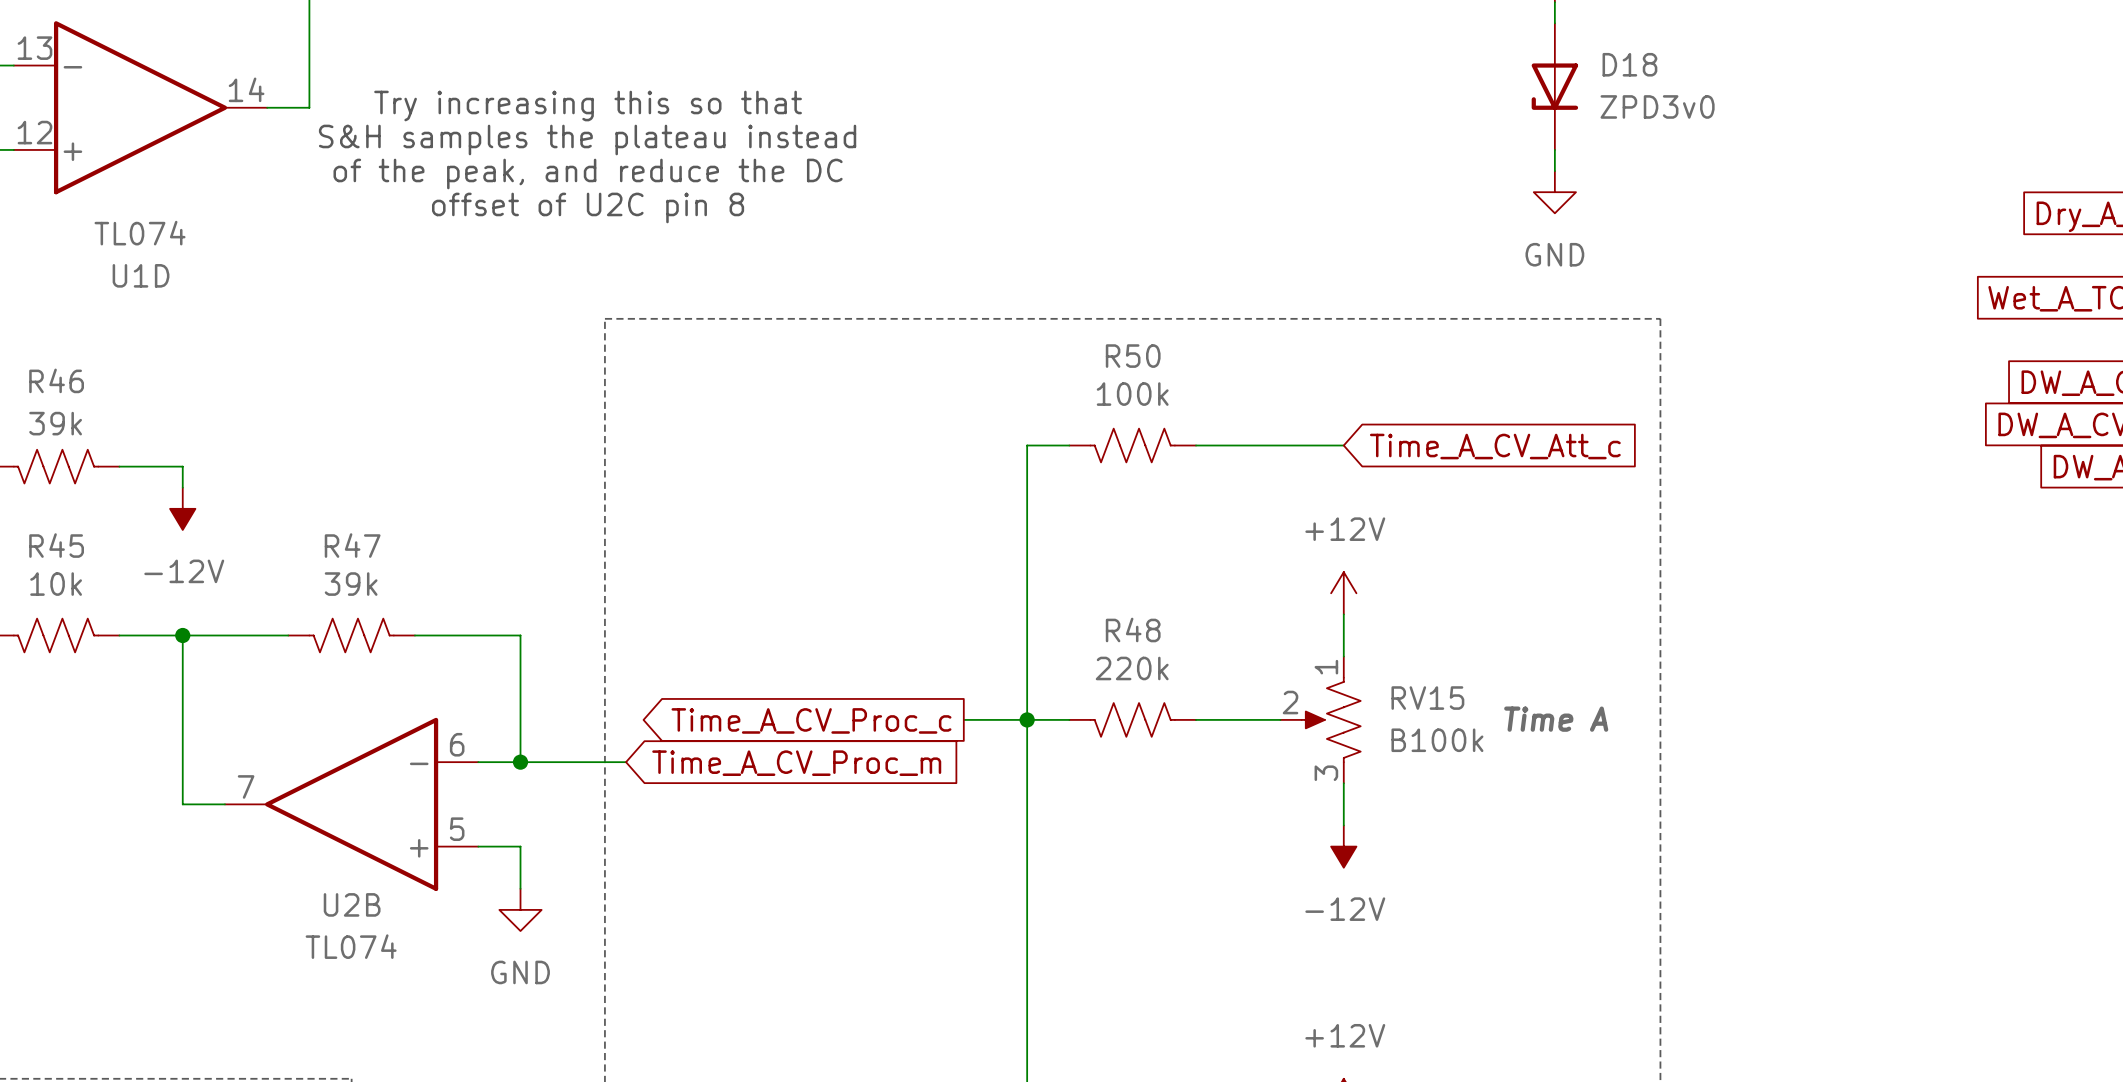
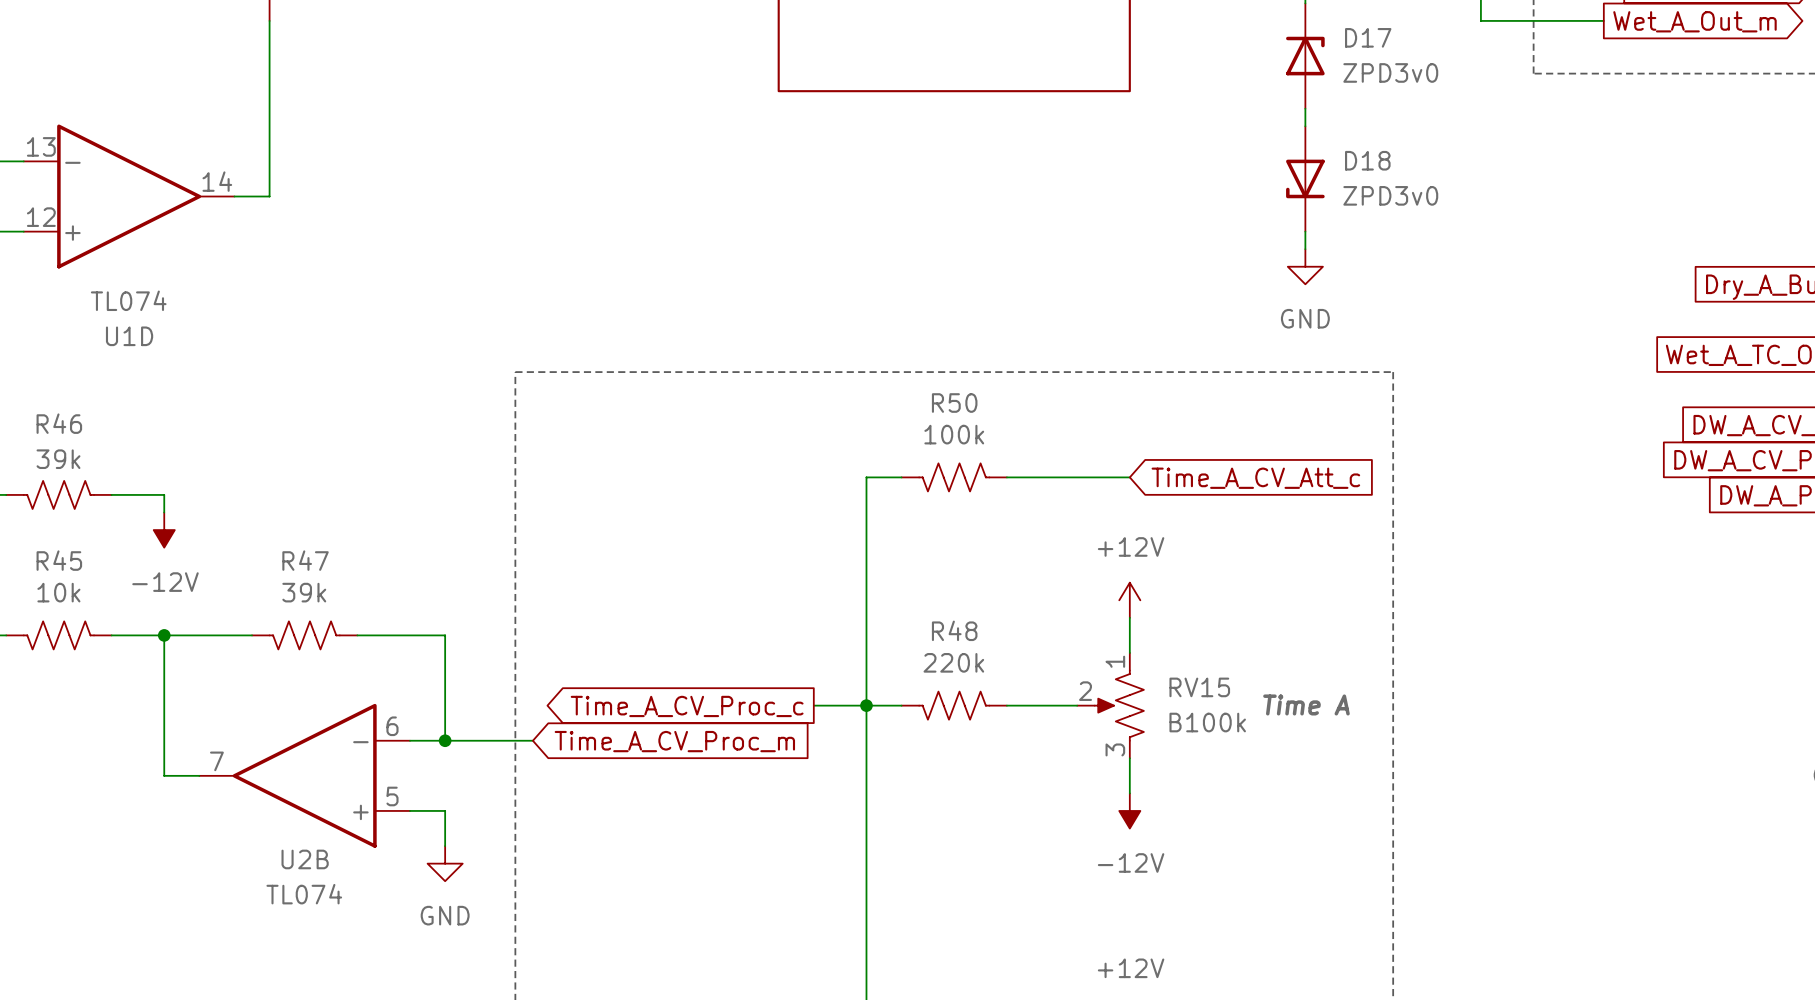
text: Try increasing this so that (588, 106) -> none
text: S&H samples the plateau instead (587, 140) -> none
text: of the peak, and reduce the DC (588, 173) -> none
text: offset of U2C pin 8 (588, 207) -> none

